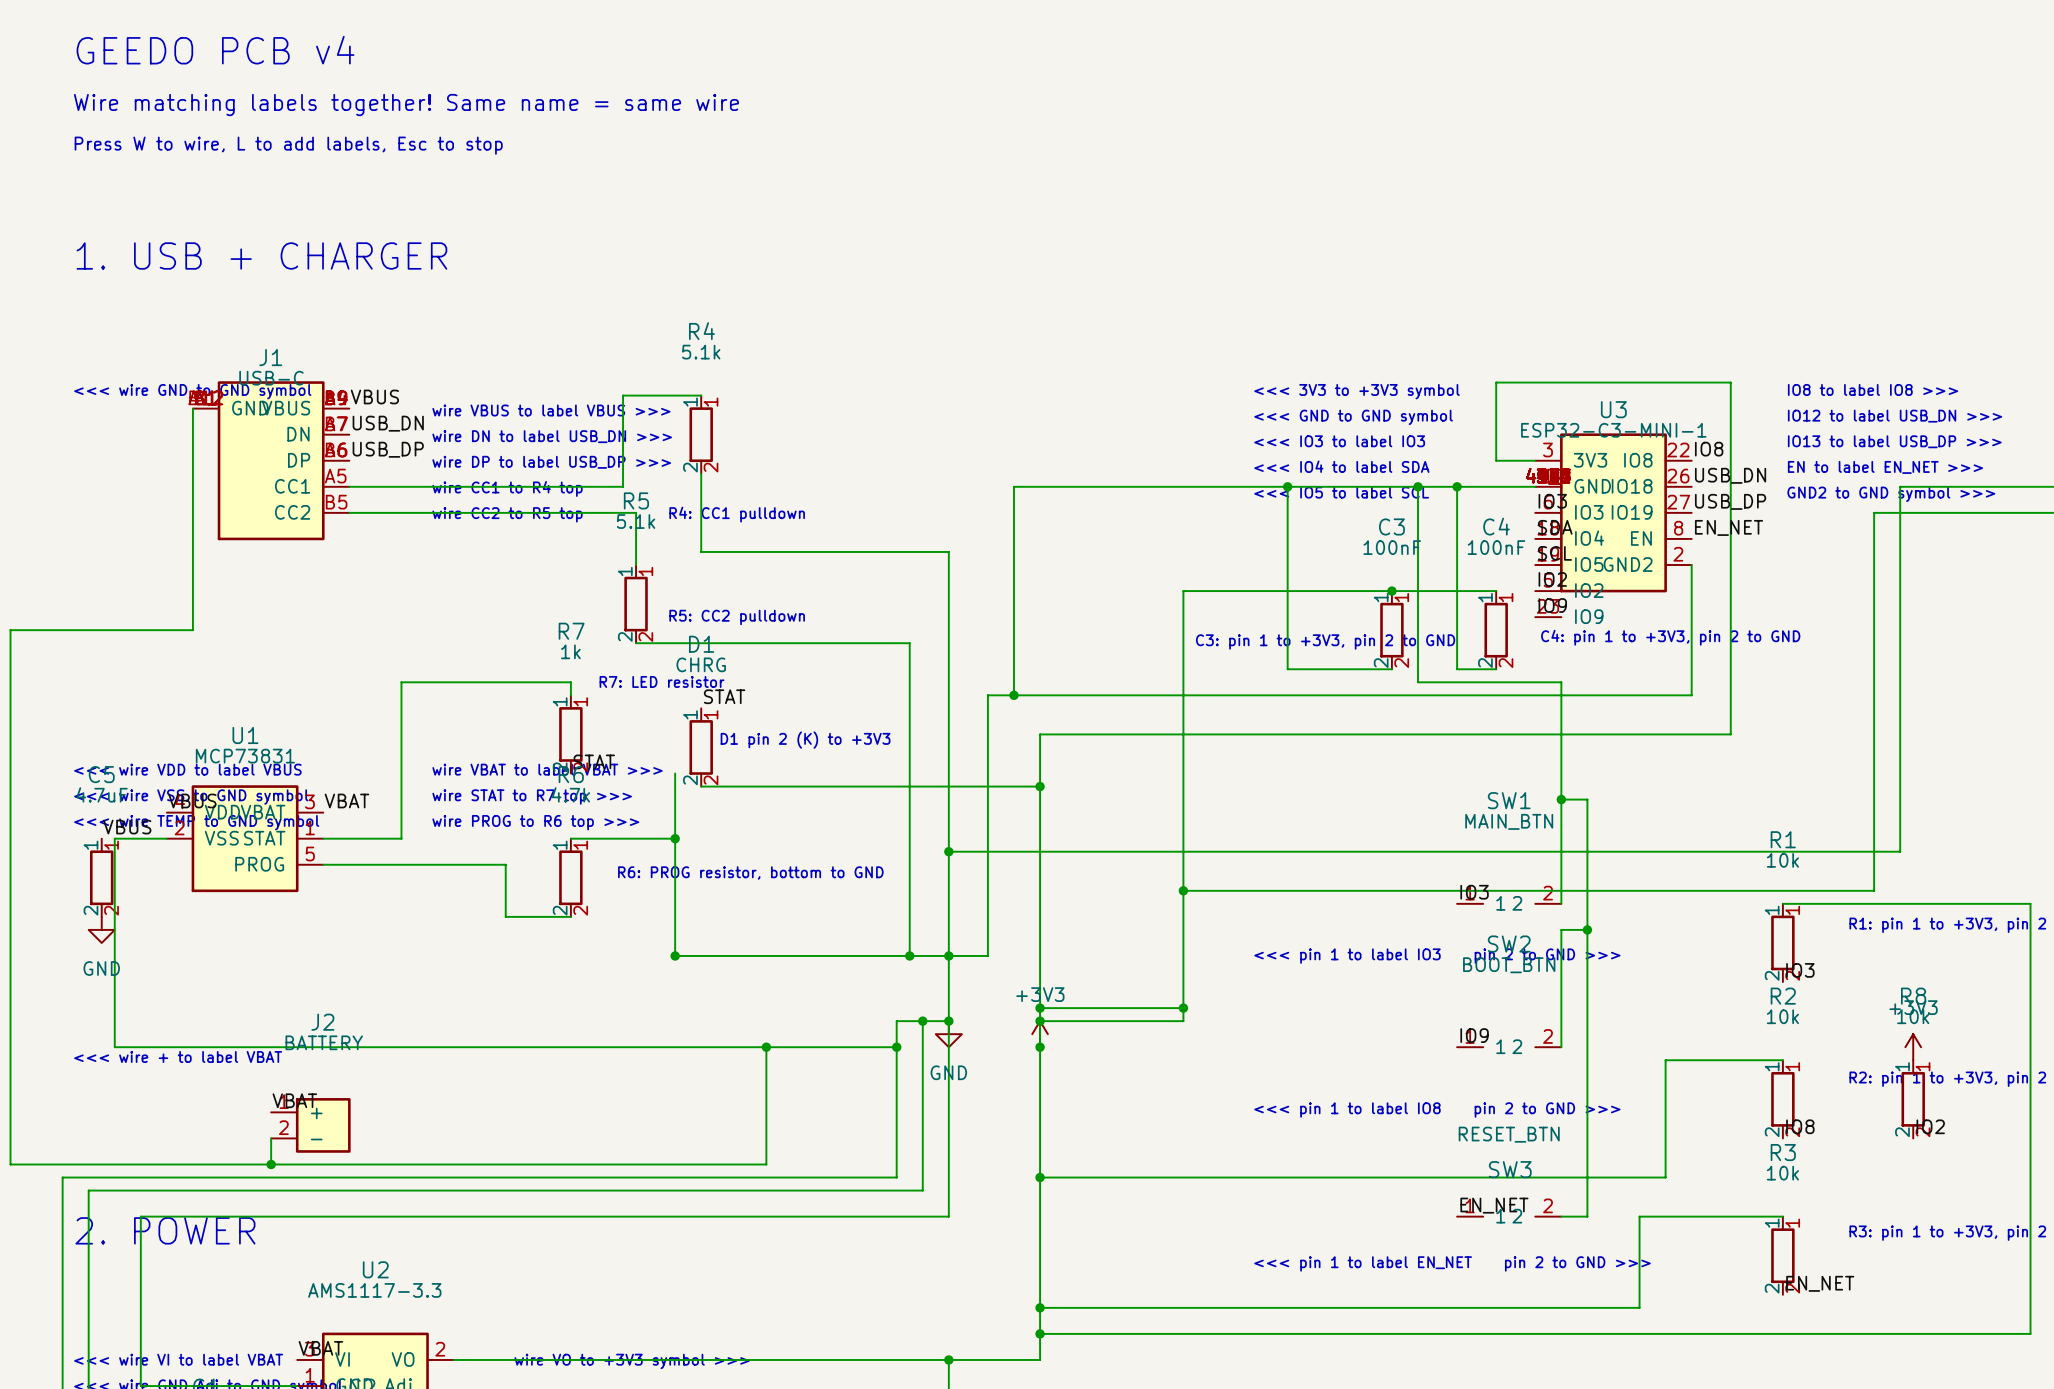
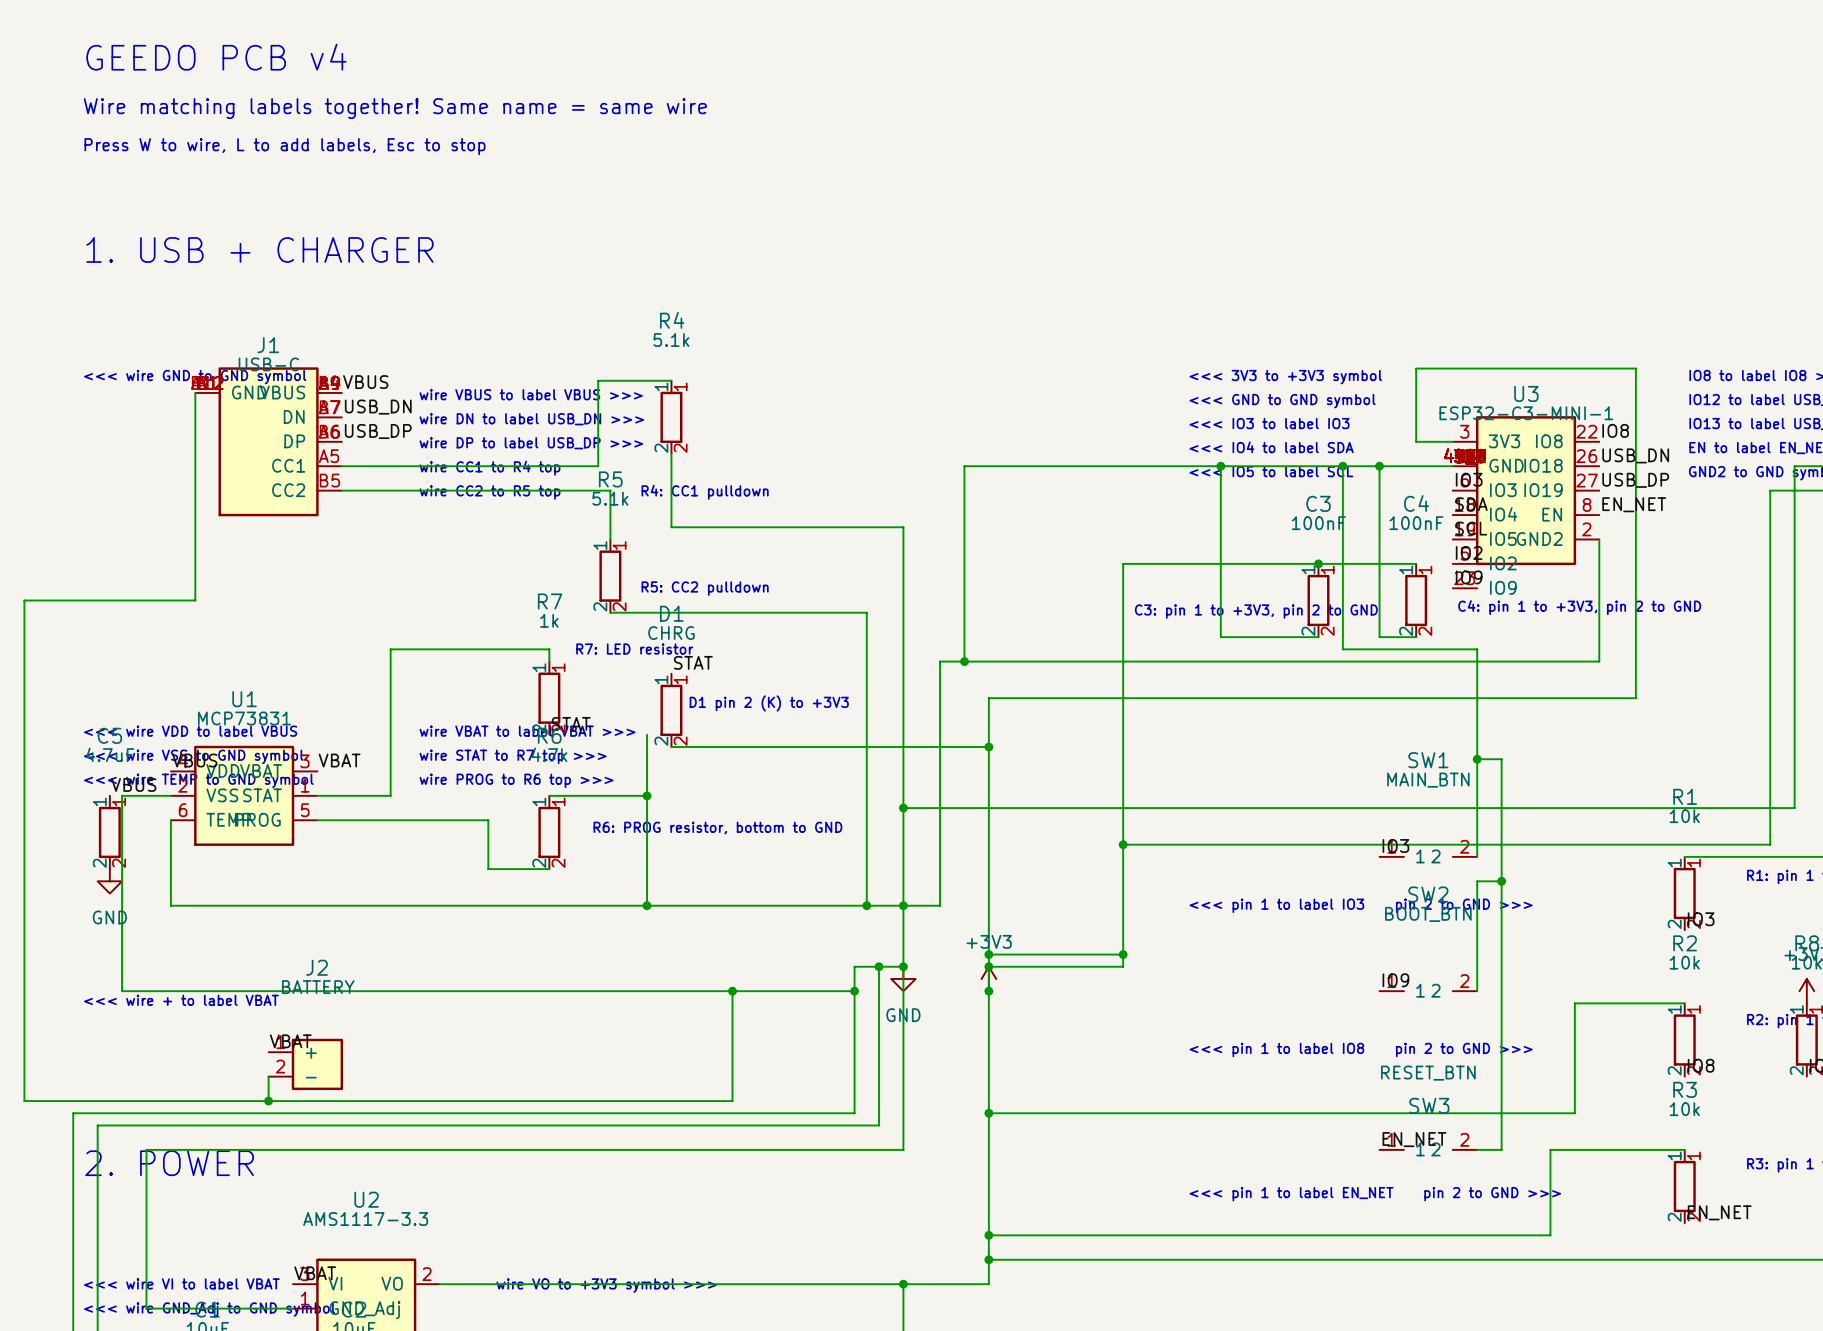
U1 symbol: [166, 785, 324, 893] -> [170, 745, 318, 846]
wire: none -> (170, 820) (170, 905) (647, 905)

